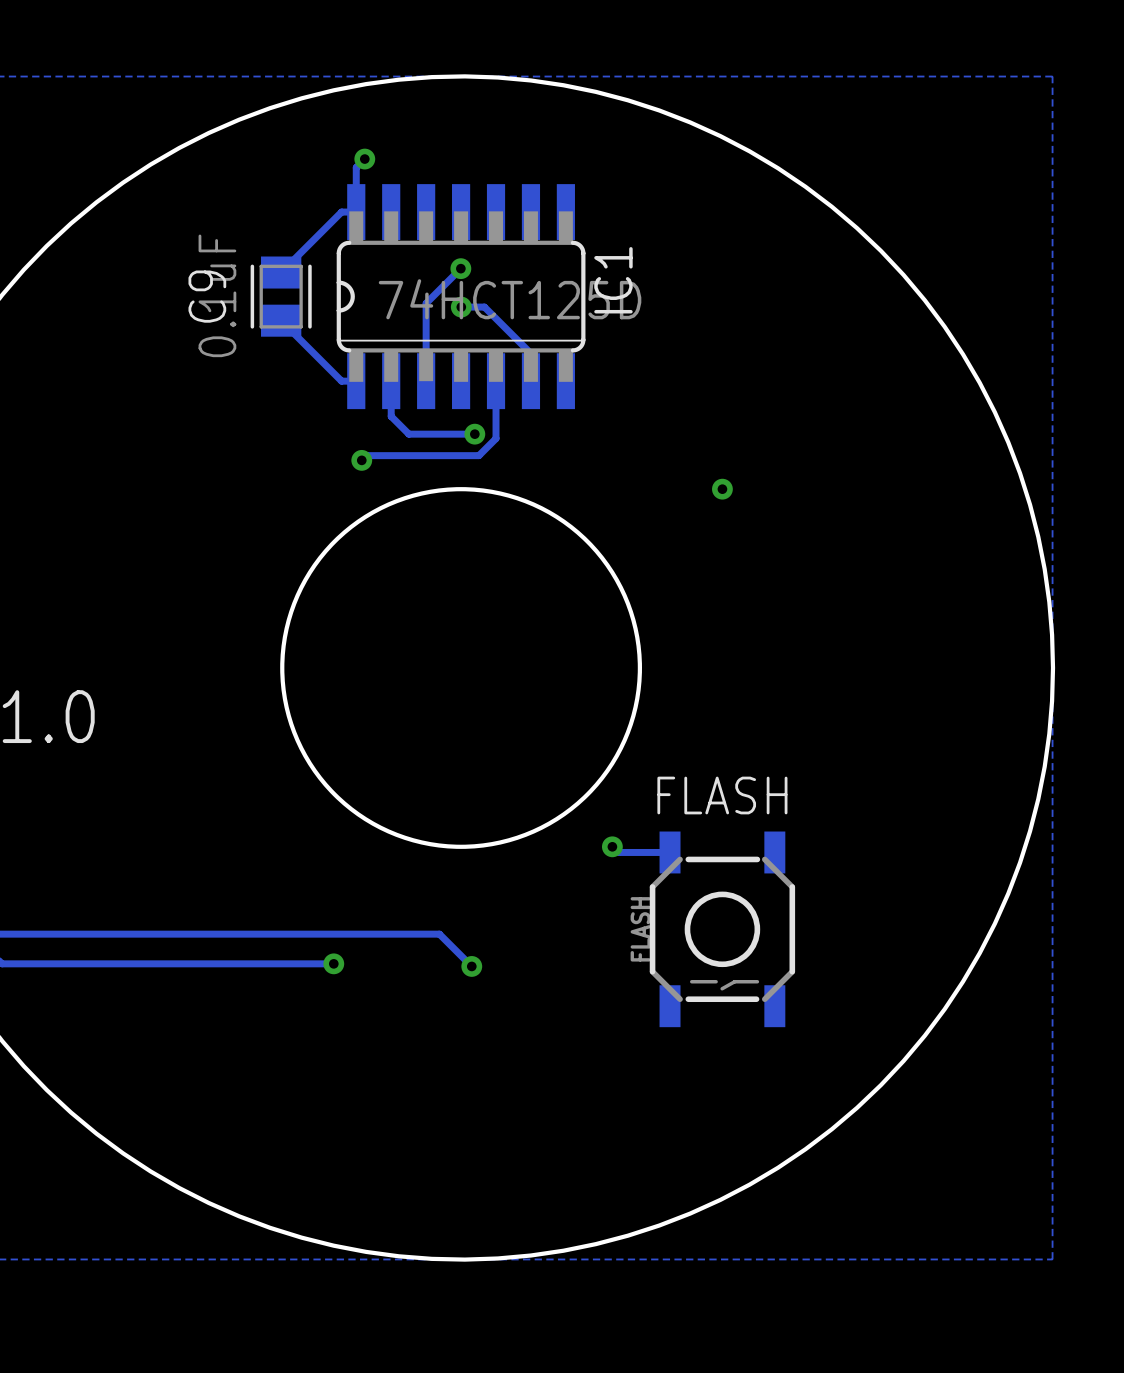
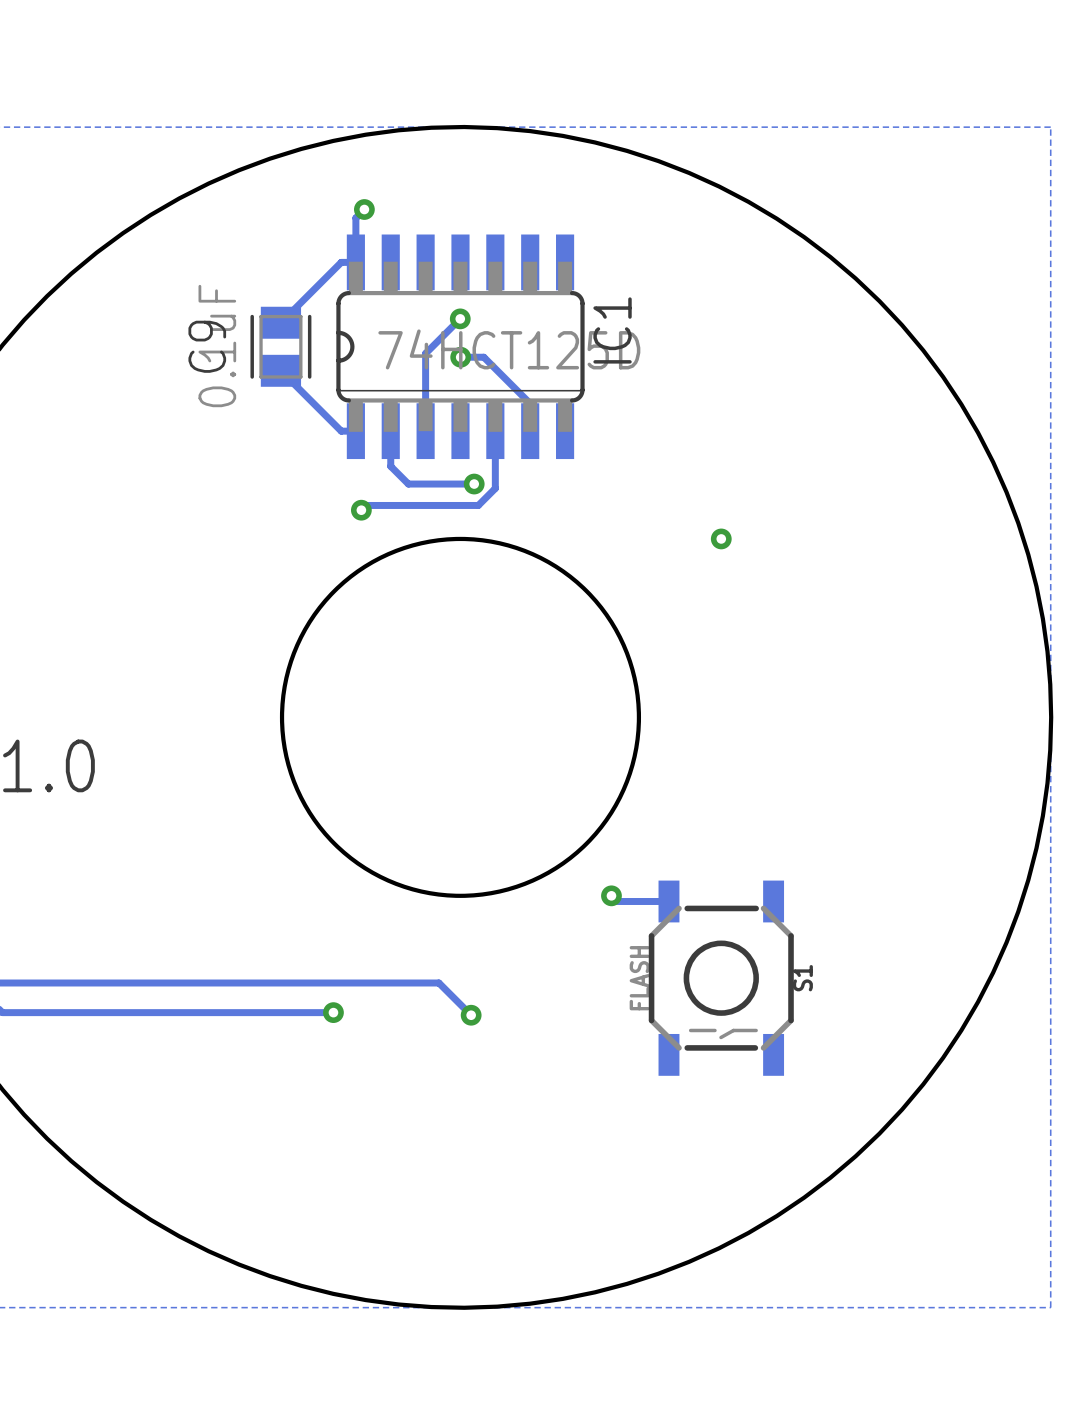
FLASH name: FLASH (722, 795) -> S1 (802, 978)

